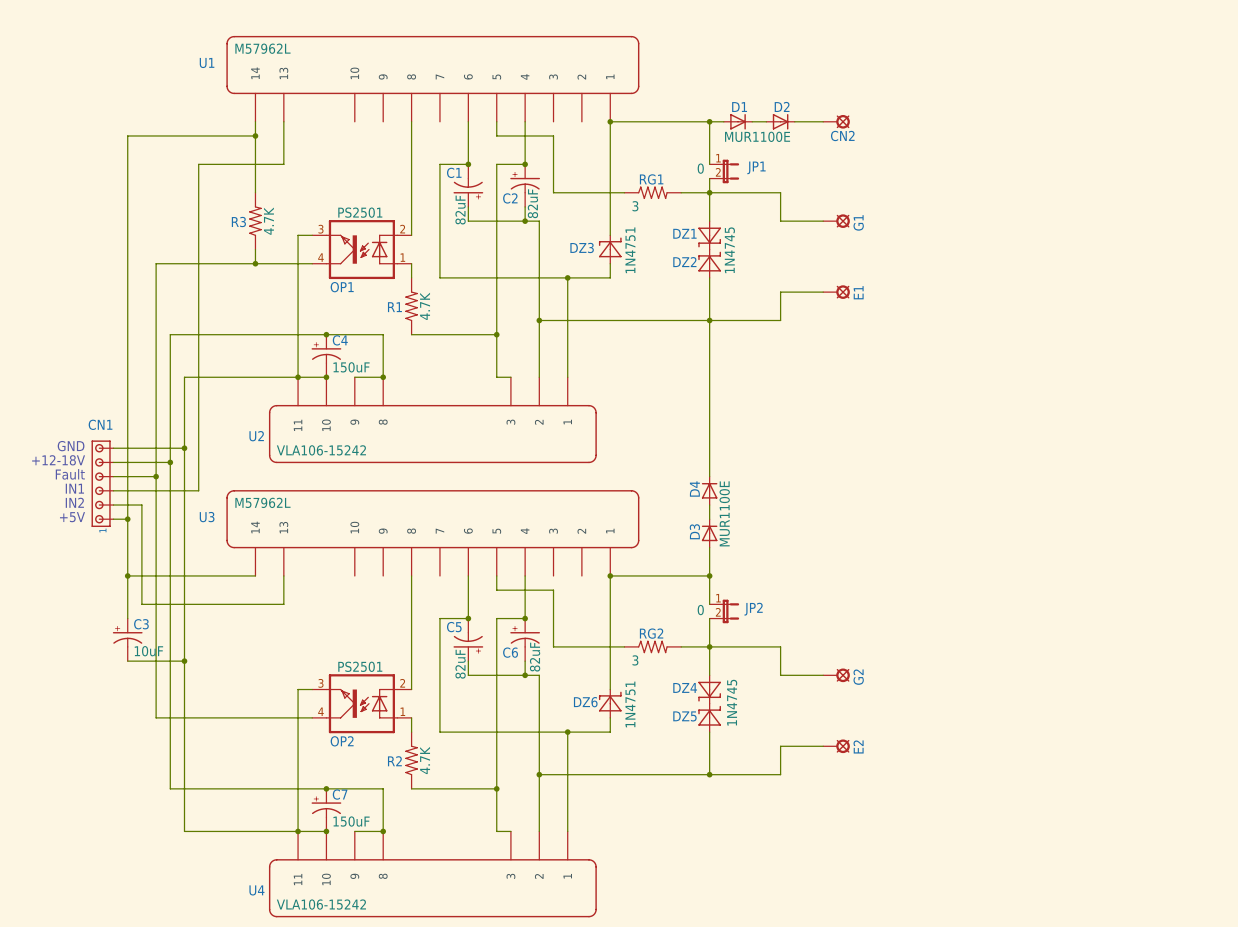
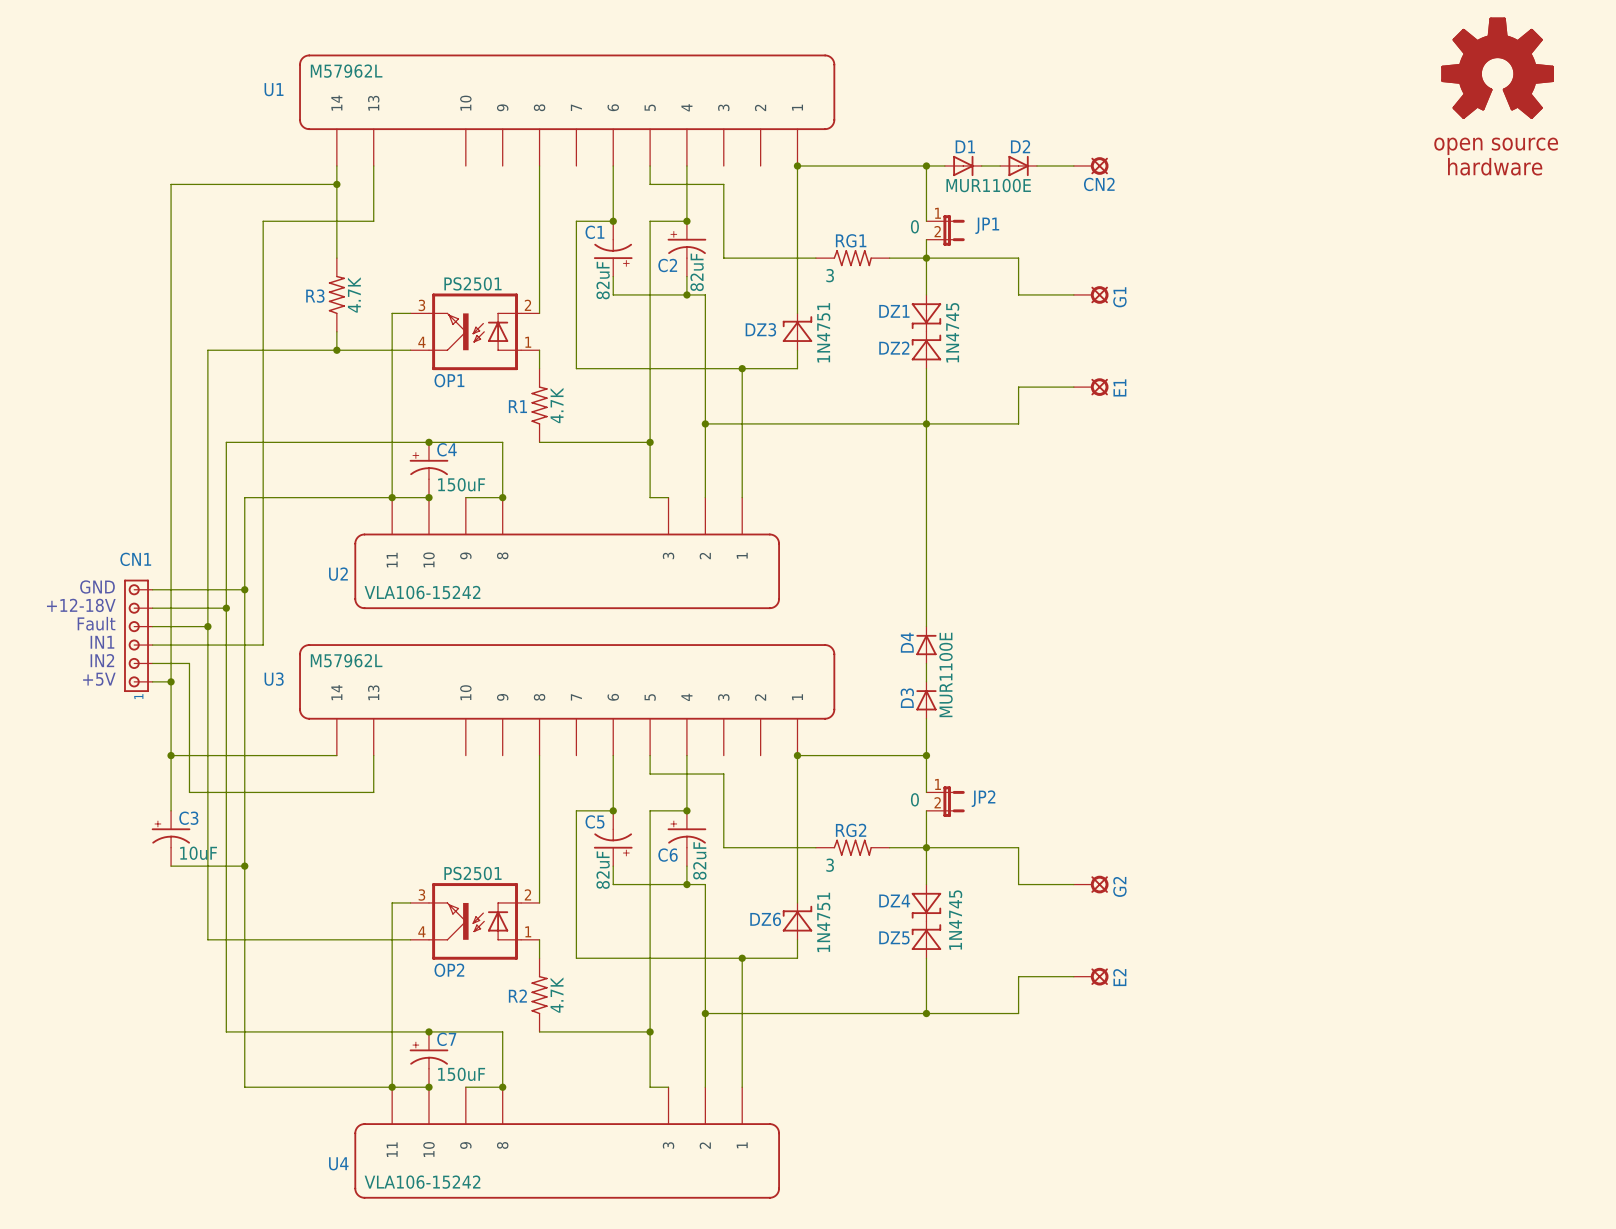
part: none -> (1497, 68)

